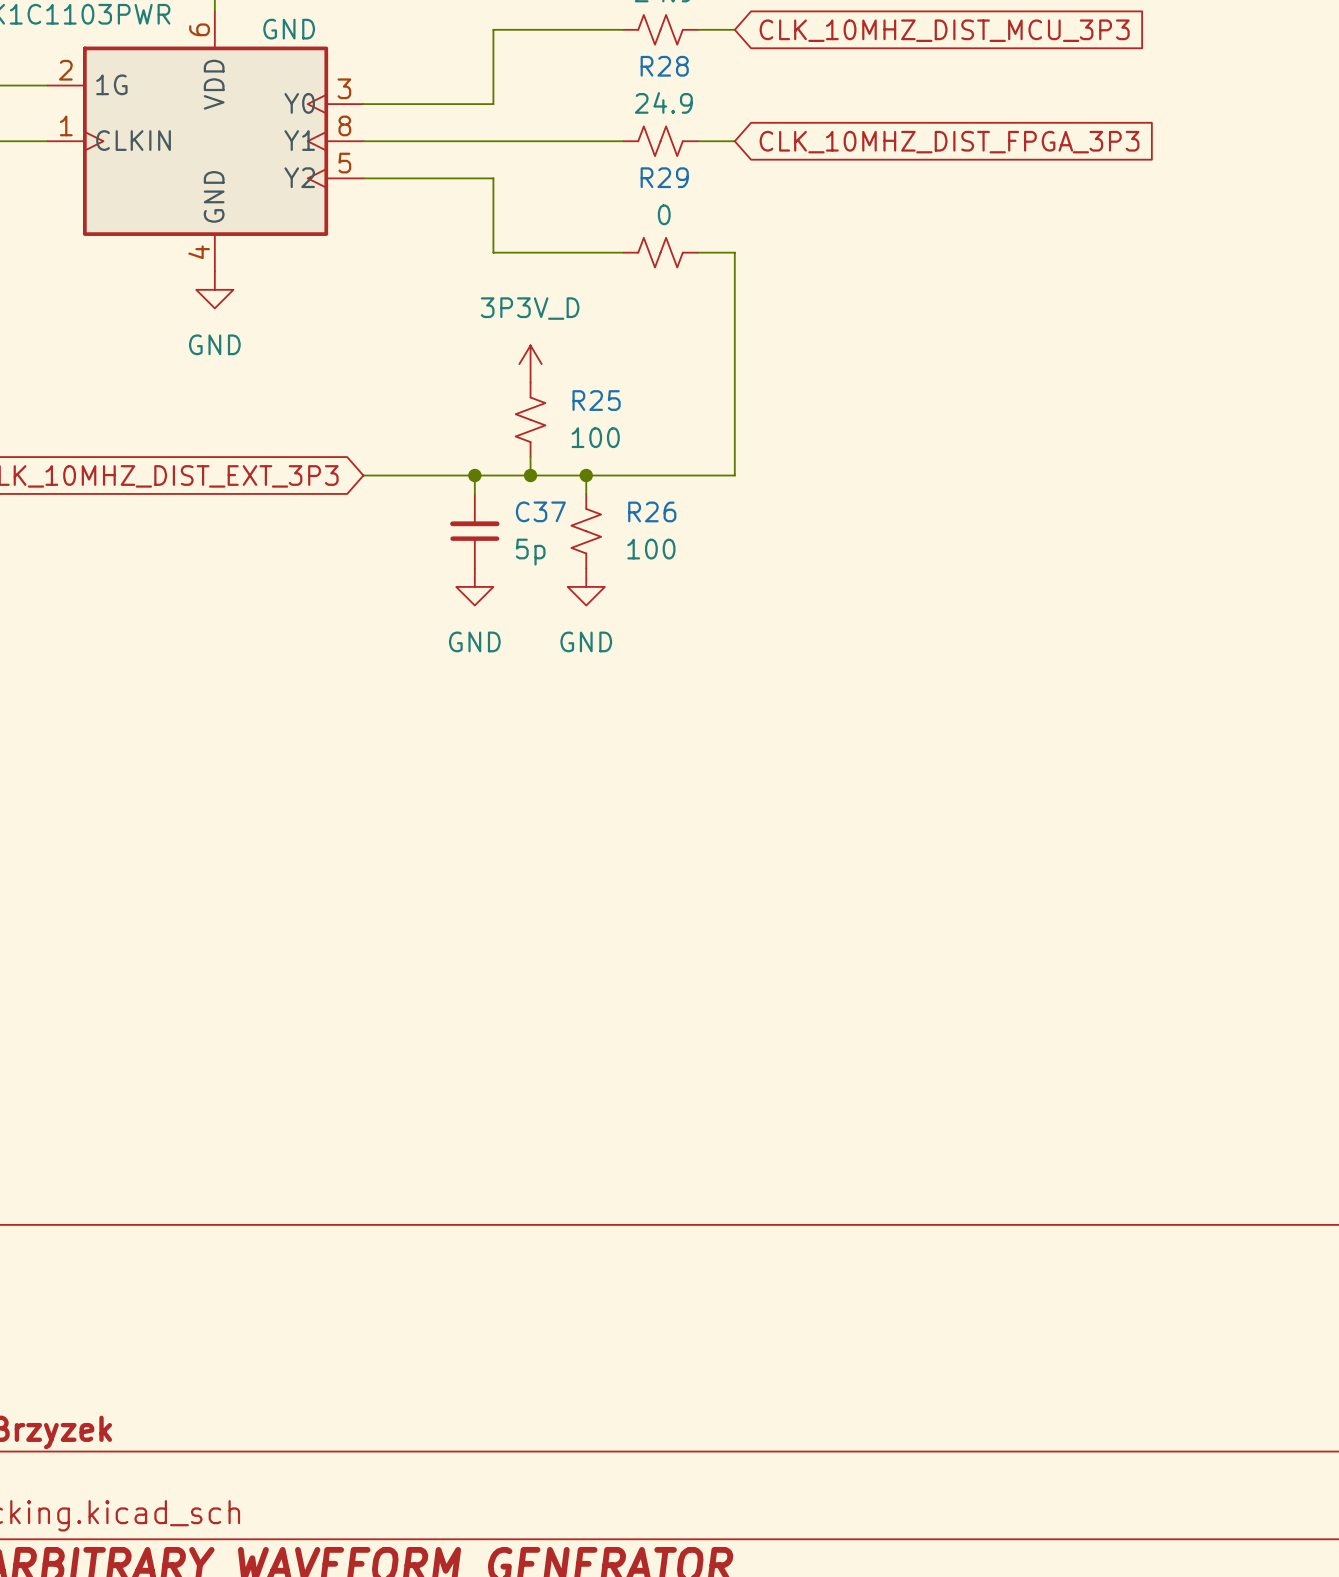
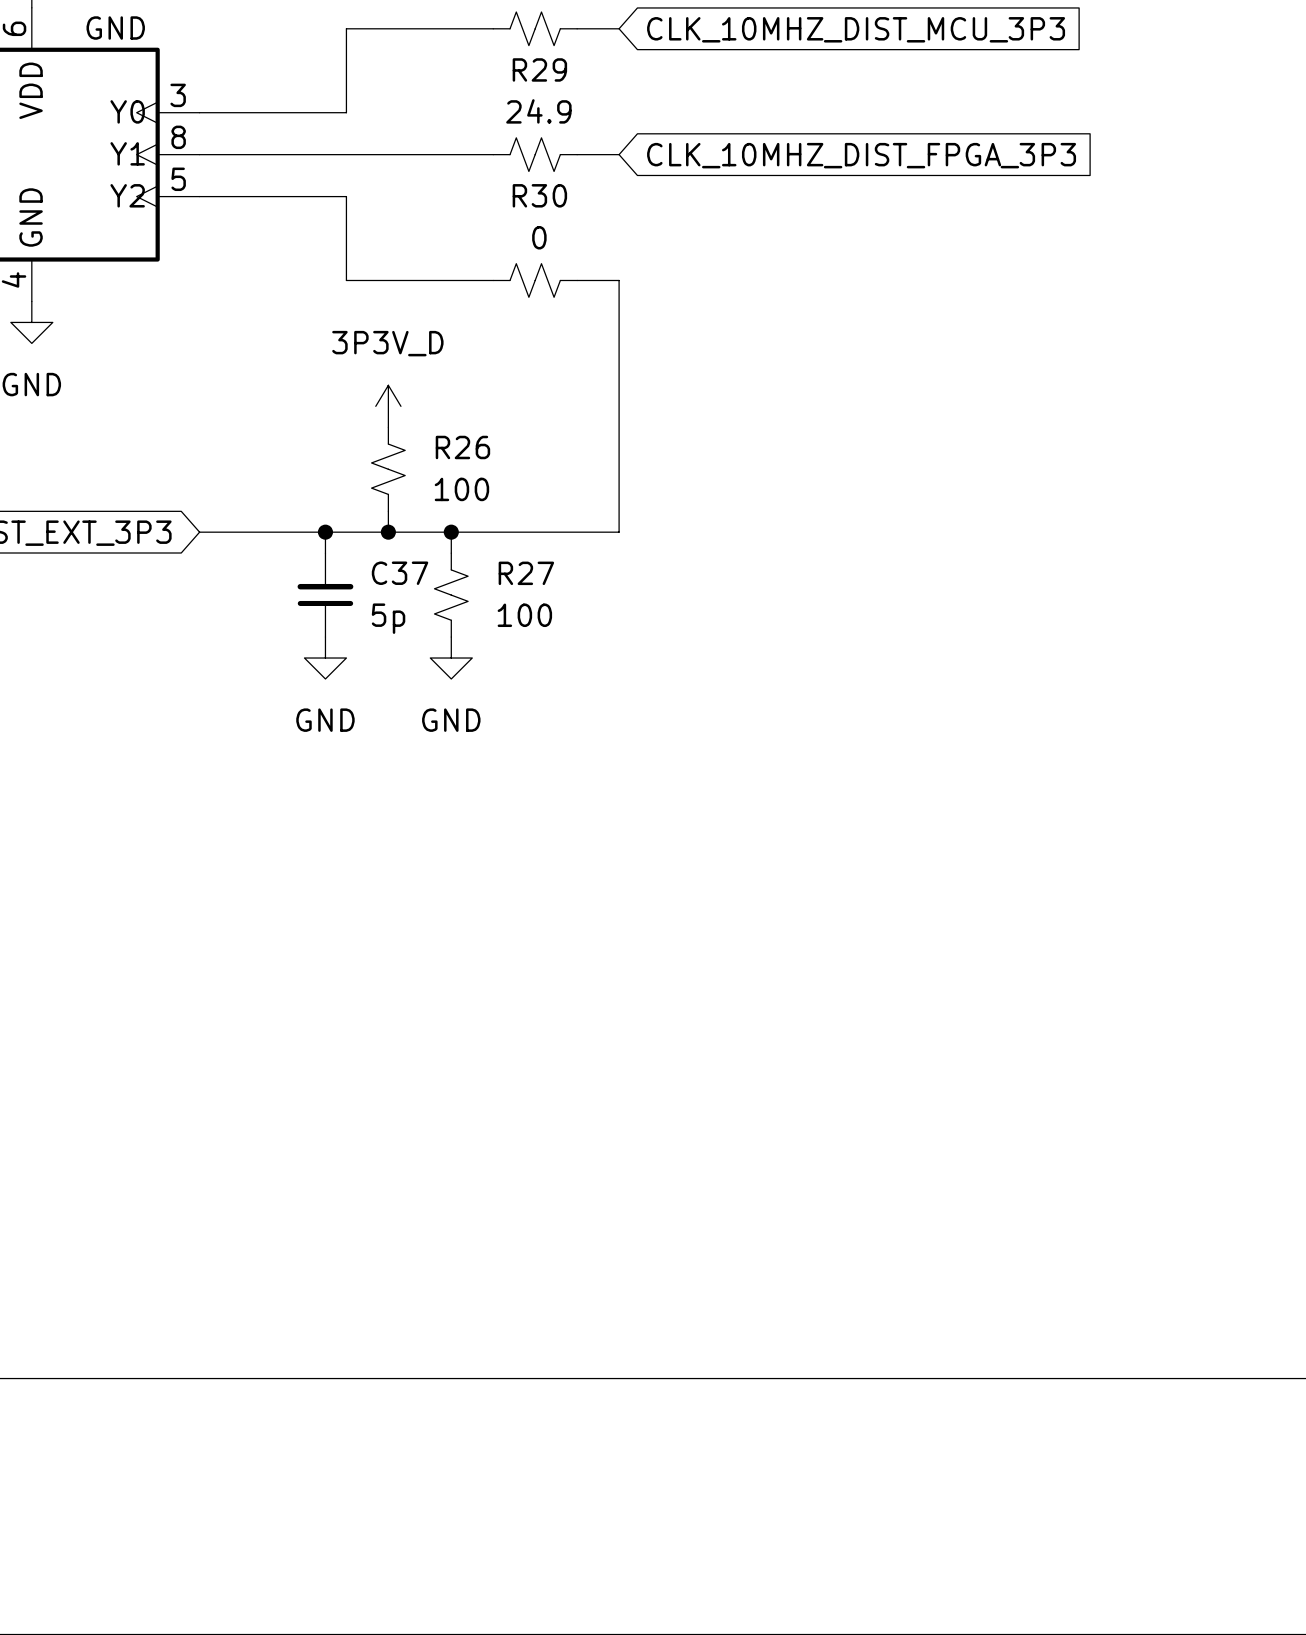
R28 name: R28 (664, 66) -> R29 (539, 69)
R29 name: R29 (664, 177) -> R30 (539, 195)
R25 name: R25 (596, 400) -> R26 (462, 447)
R26 name: R26 (652, 511) -> R27 (526, 573)

